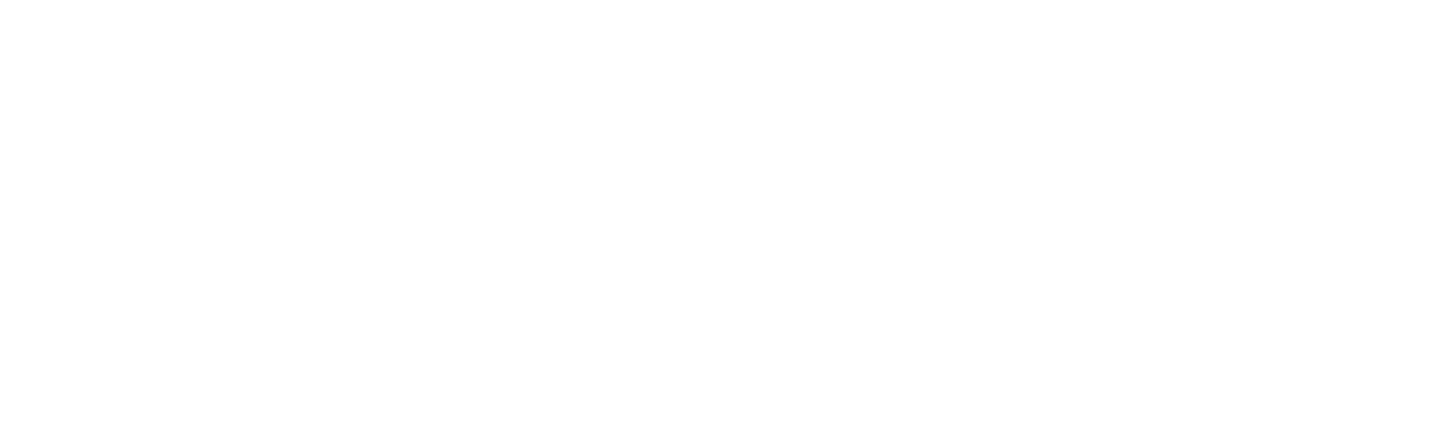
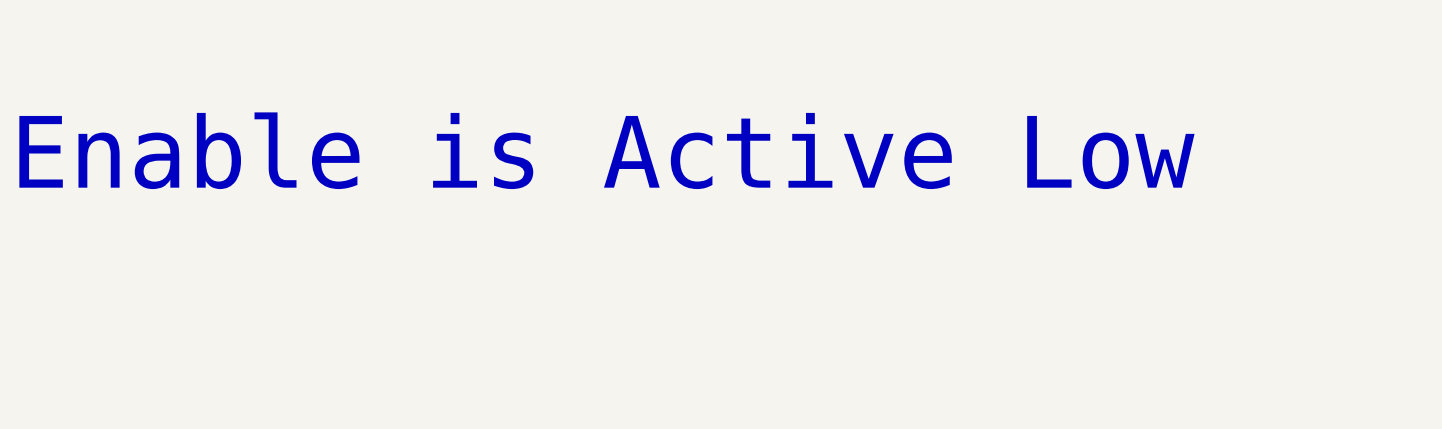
text: none -> Enable is Active Low (606, 150)

